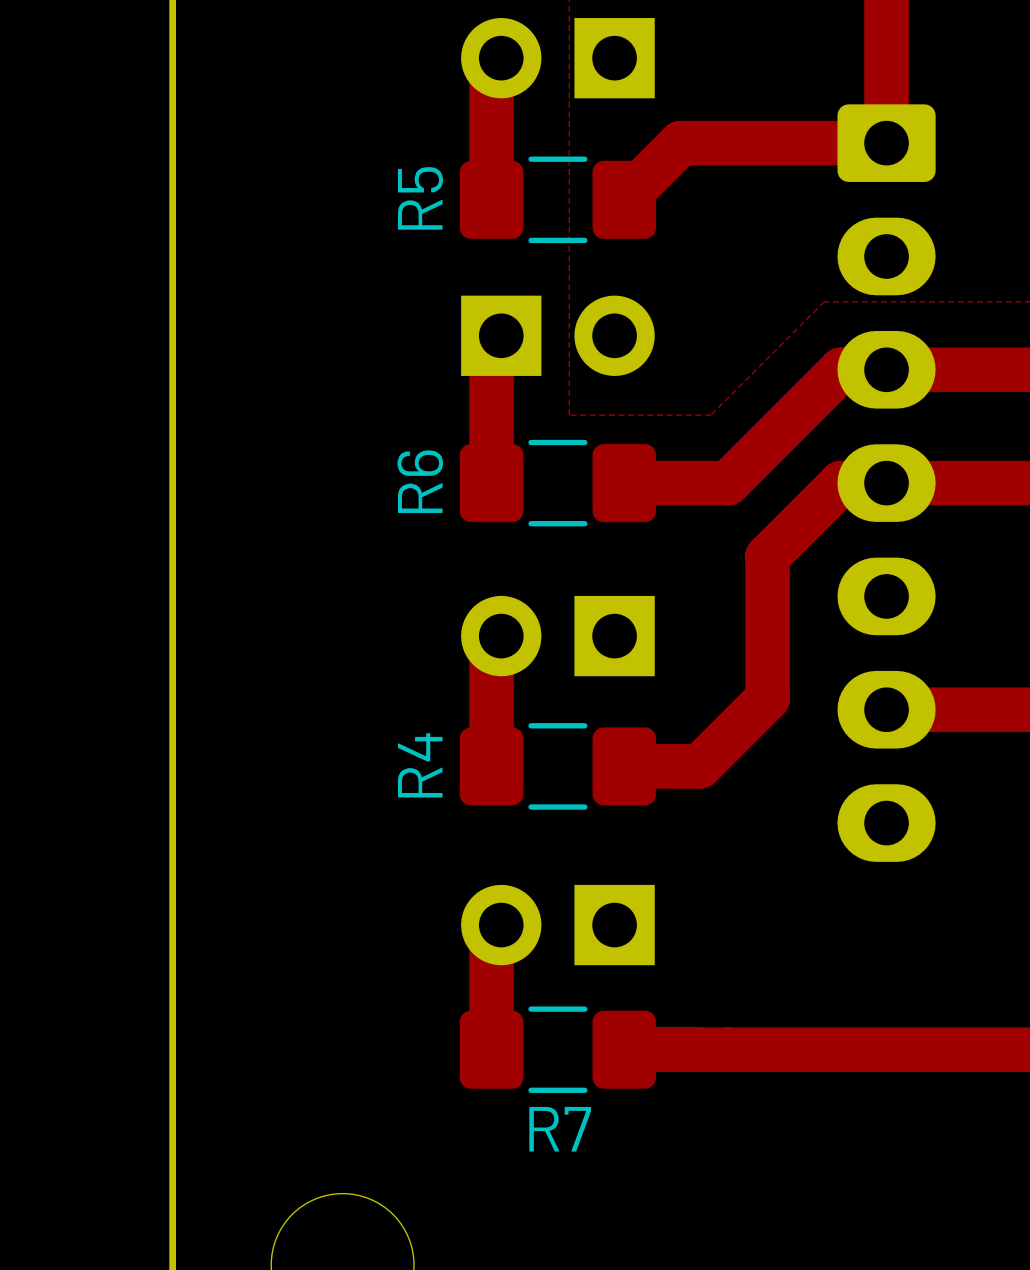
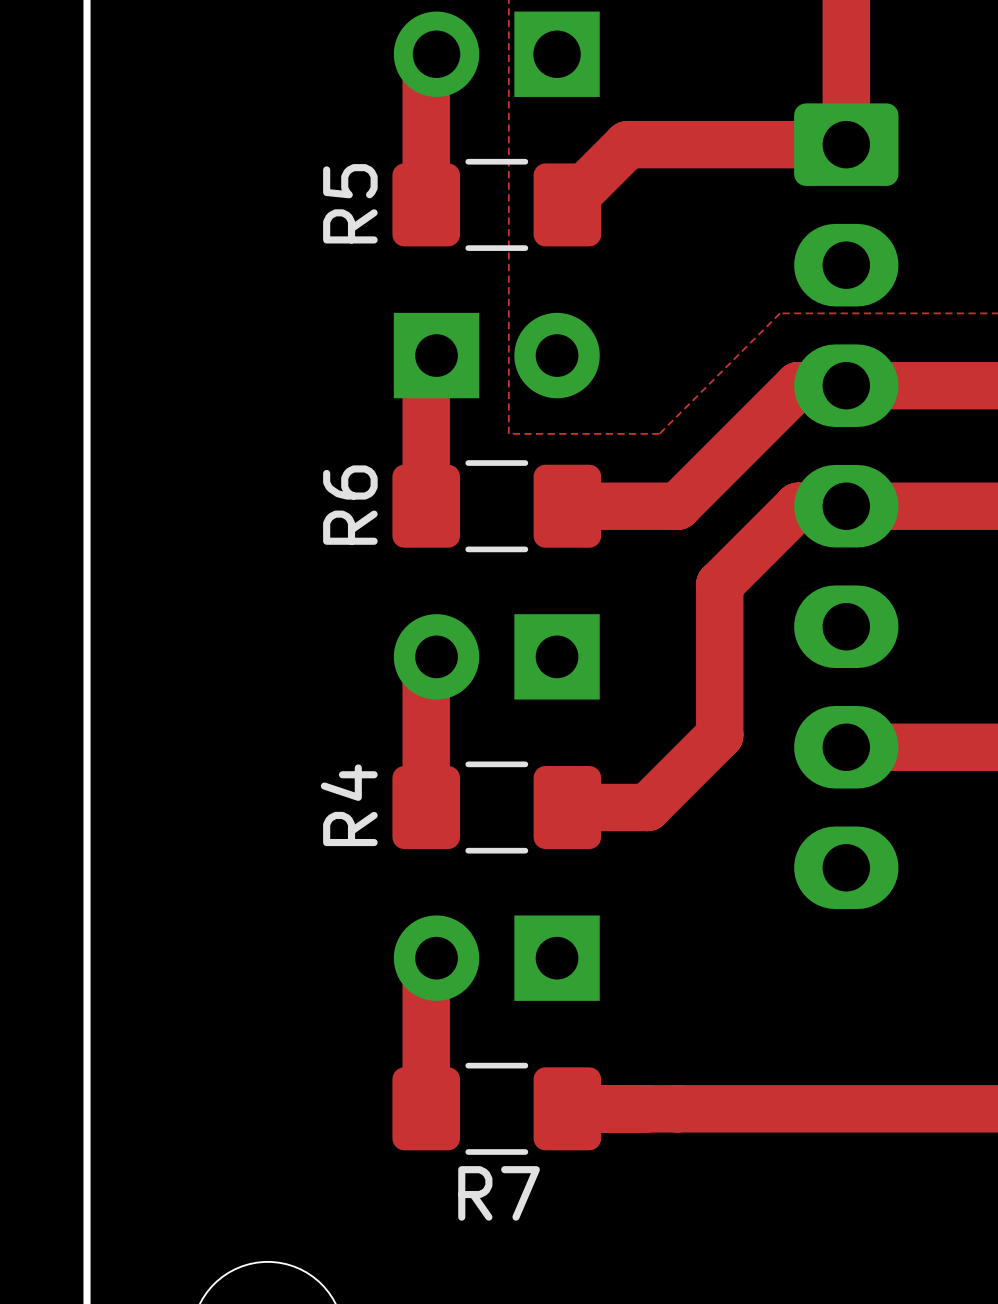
part footprint: [461, 295, 655, 376] -> [393, 312, 600, 399]
part footprint: [461, 595, 655, 677] -> [393, 614, 600, 700]
part footprint: [461, 884, 655, 966] -> [393, 915, 600, 1001]

